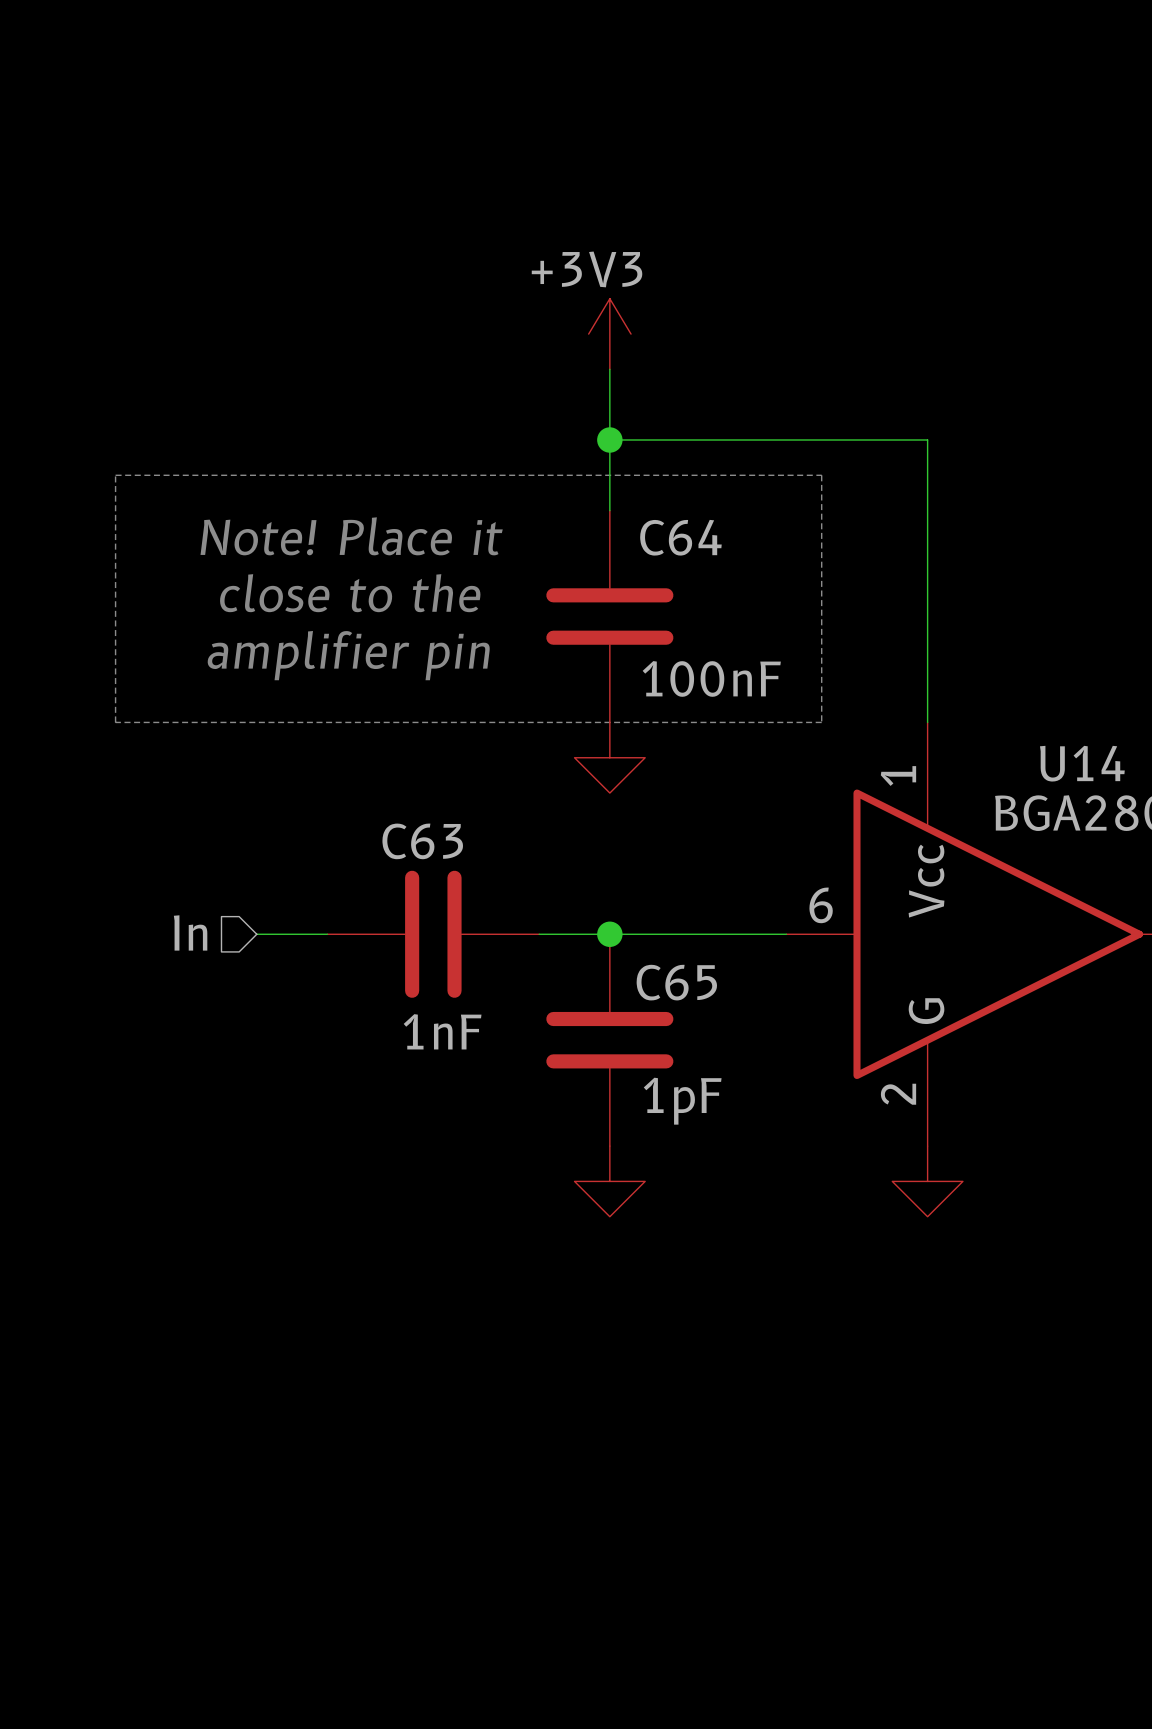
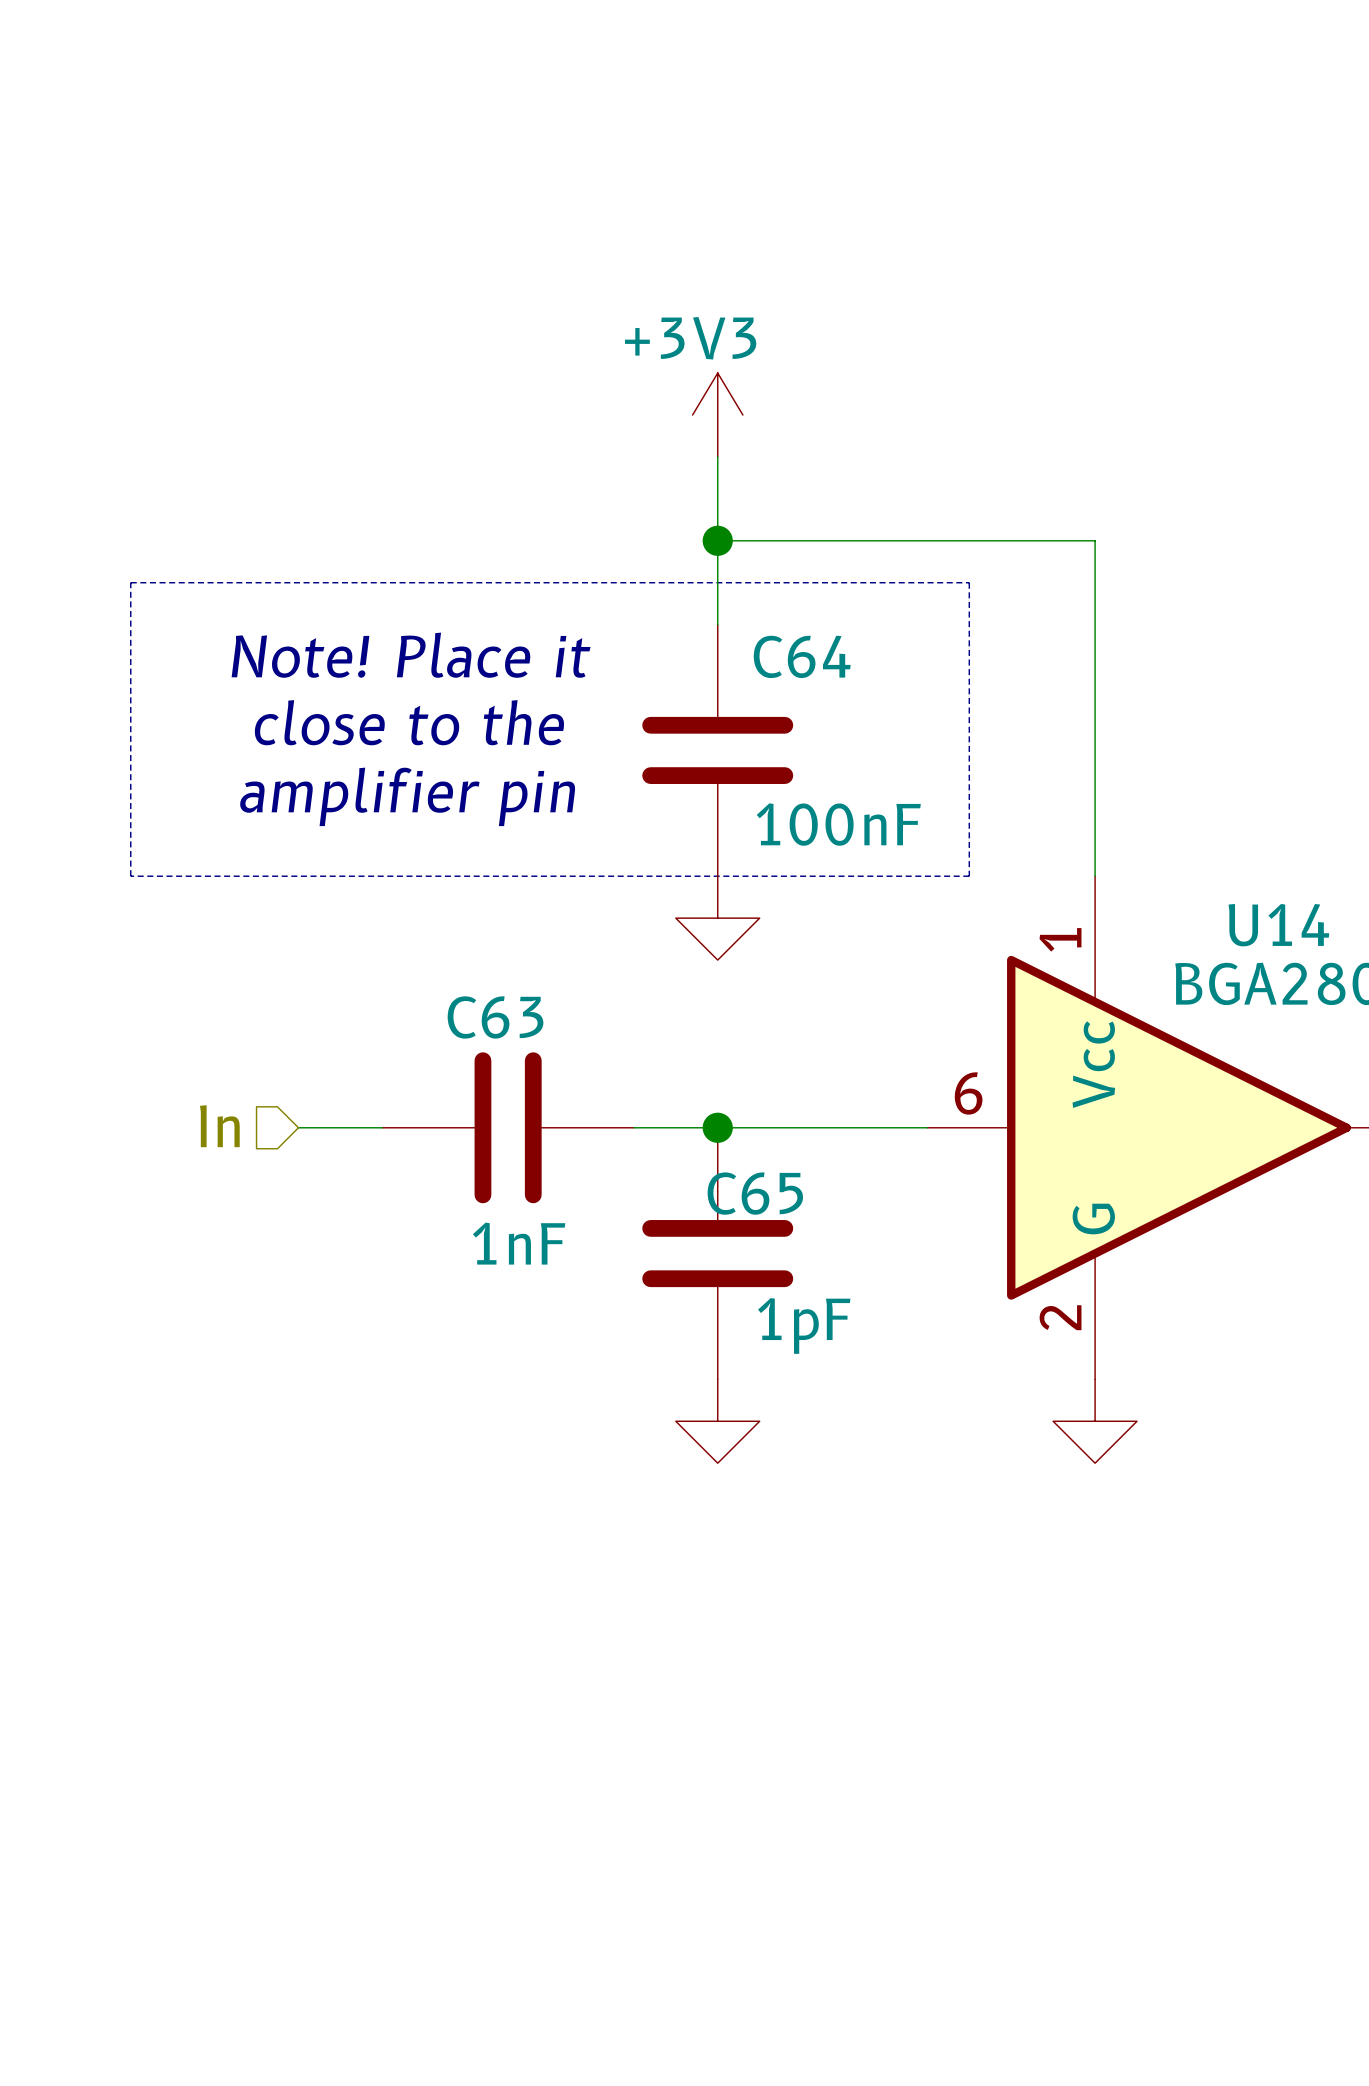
C65 name position: C65 (676, 982) -> C65 (755, 1193)

